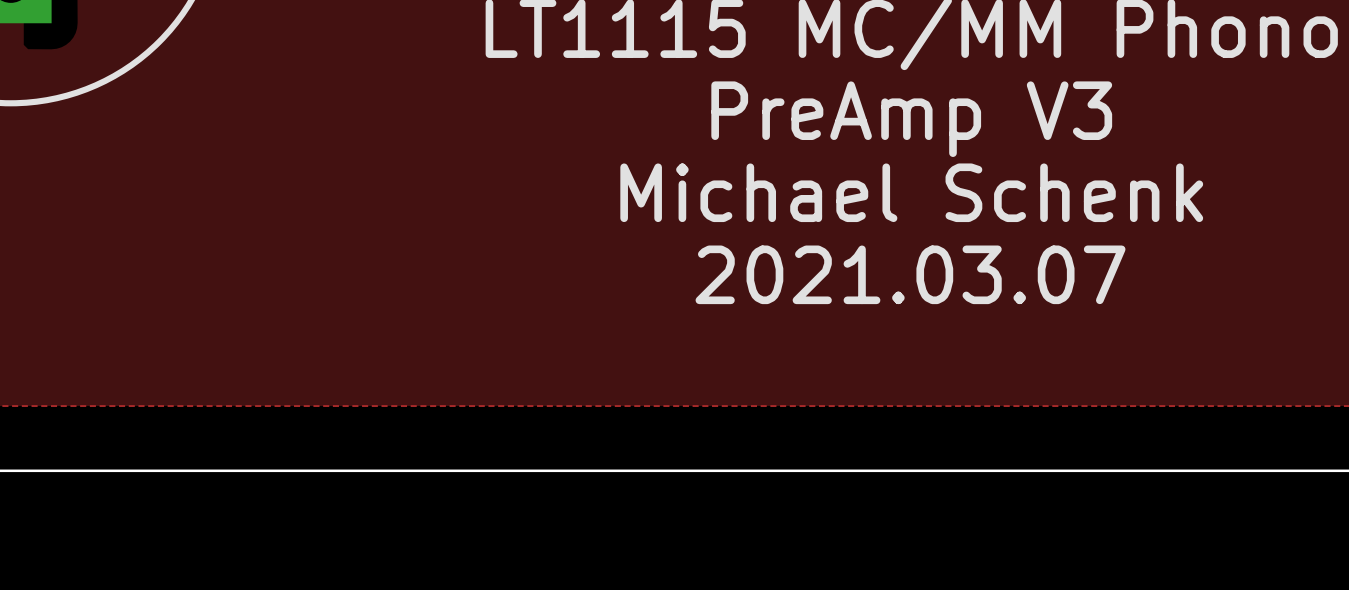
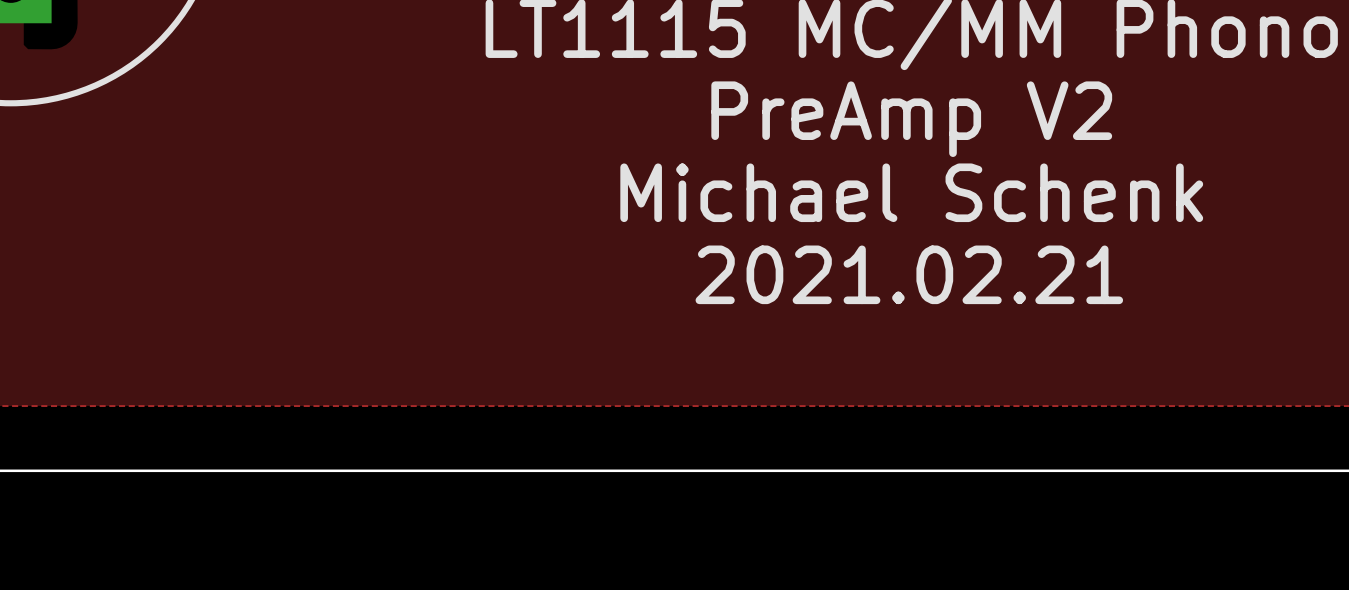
text: PreAmp V3 (911, 119) -> PreAmp V2 (911, 119)
text: 2021.03.07 (910, 274) -> 2021.02.21 (909, 274)

